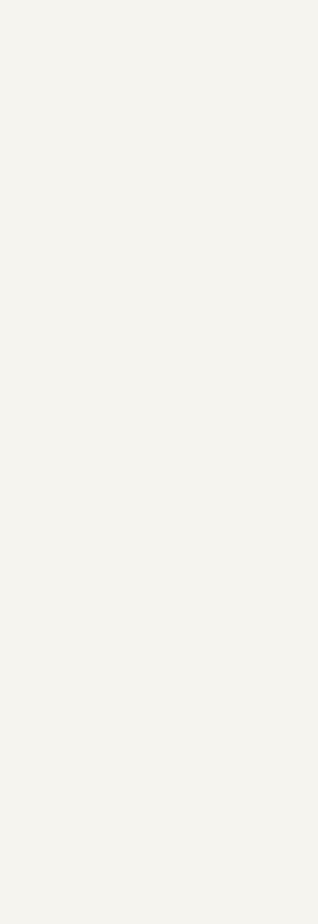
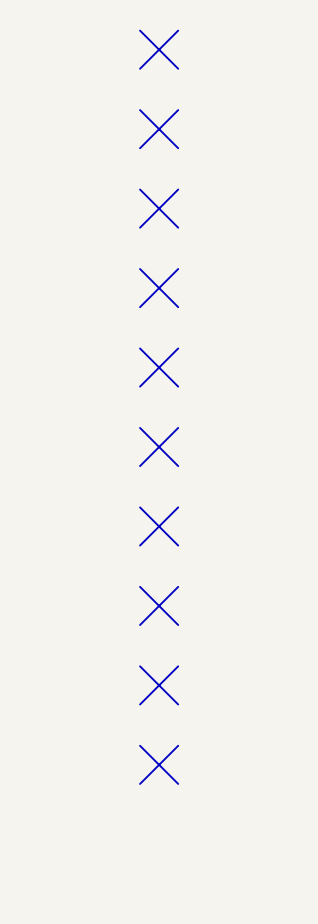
no-connect mark: none -> (159, 49)
no-connect mark: none -> (159, 129)
no-connect mark: none -> (159, 208)
no-connect mark: none -> (159, 288)
no-connect mark: none -> (159, 367)
no-connect mark: none -> (159, 447)
no-connect mark: none -> (159, 526)
no-connect mark: none -> (159, 605)
no-connect mark: none -> (159, 685)
no-connect mark: none -> (159, 764)

